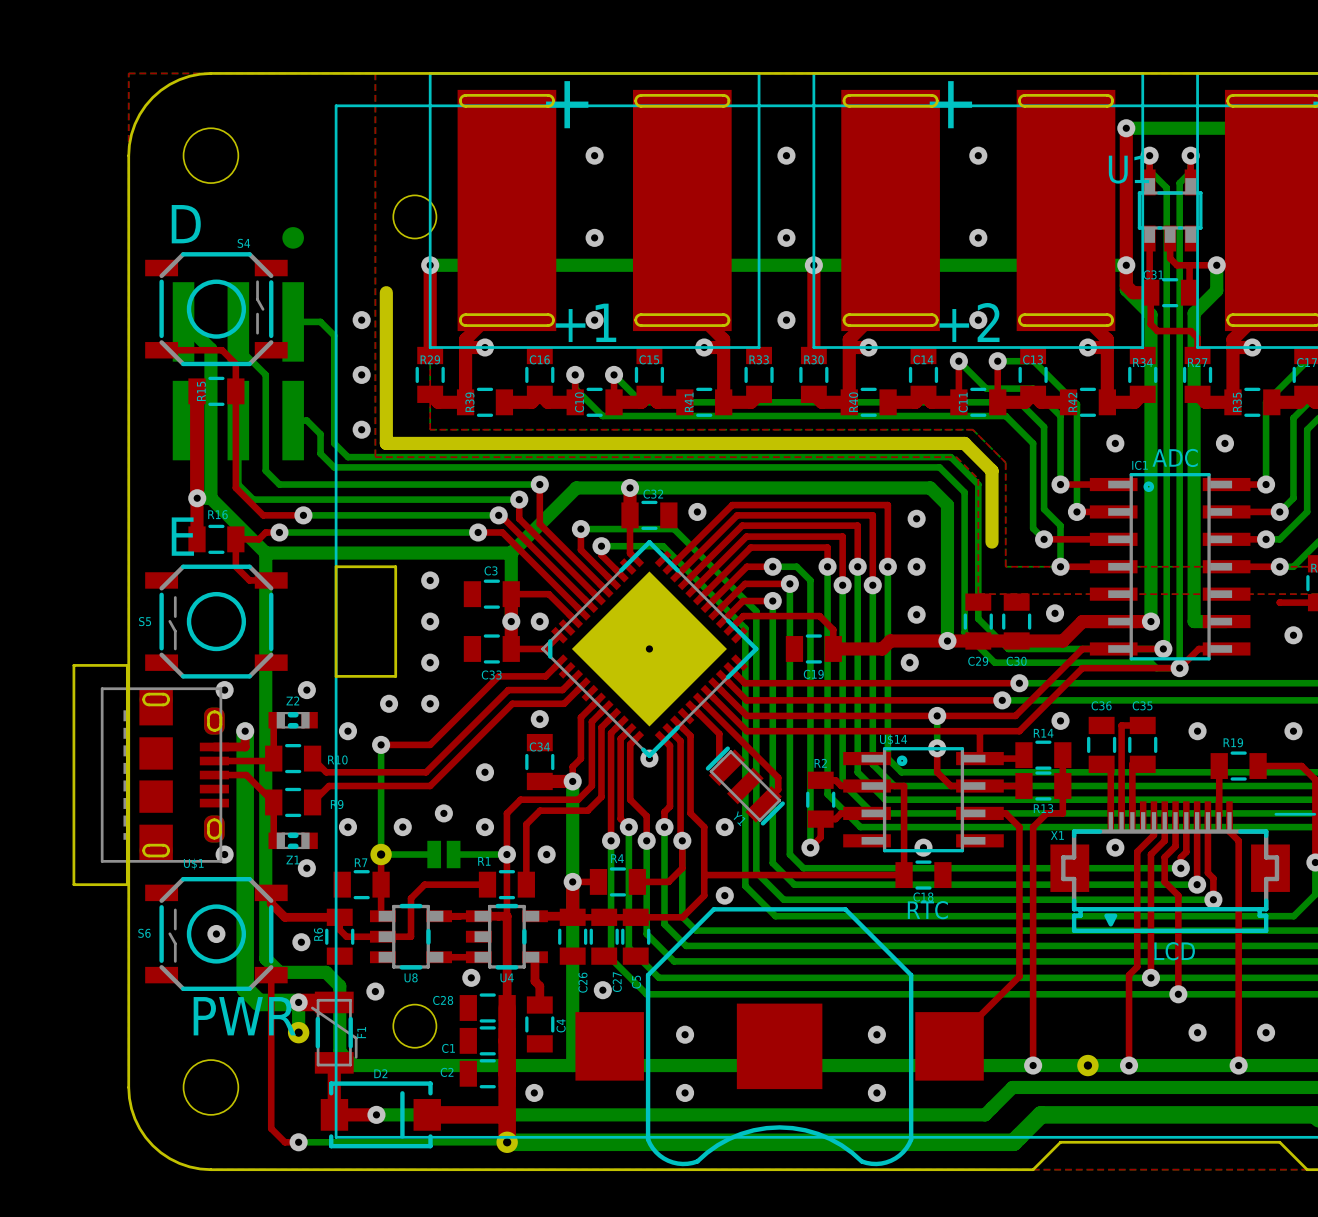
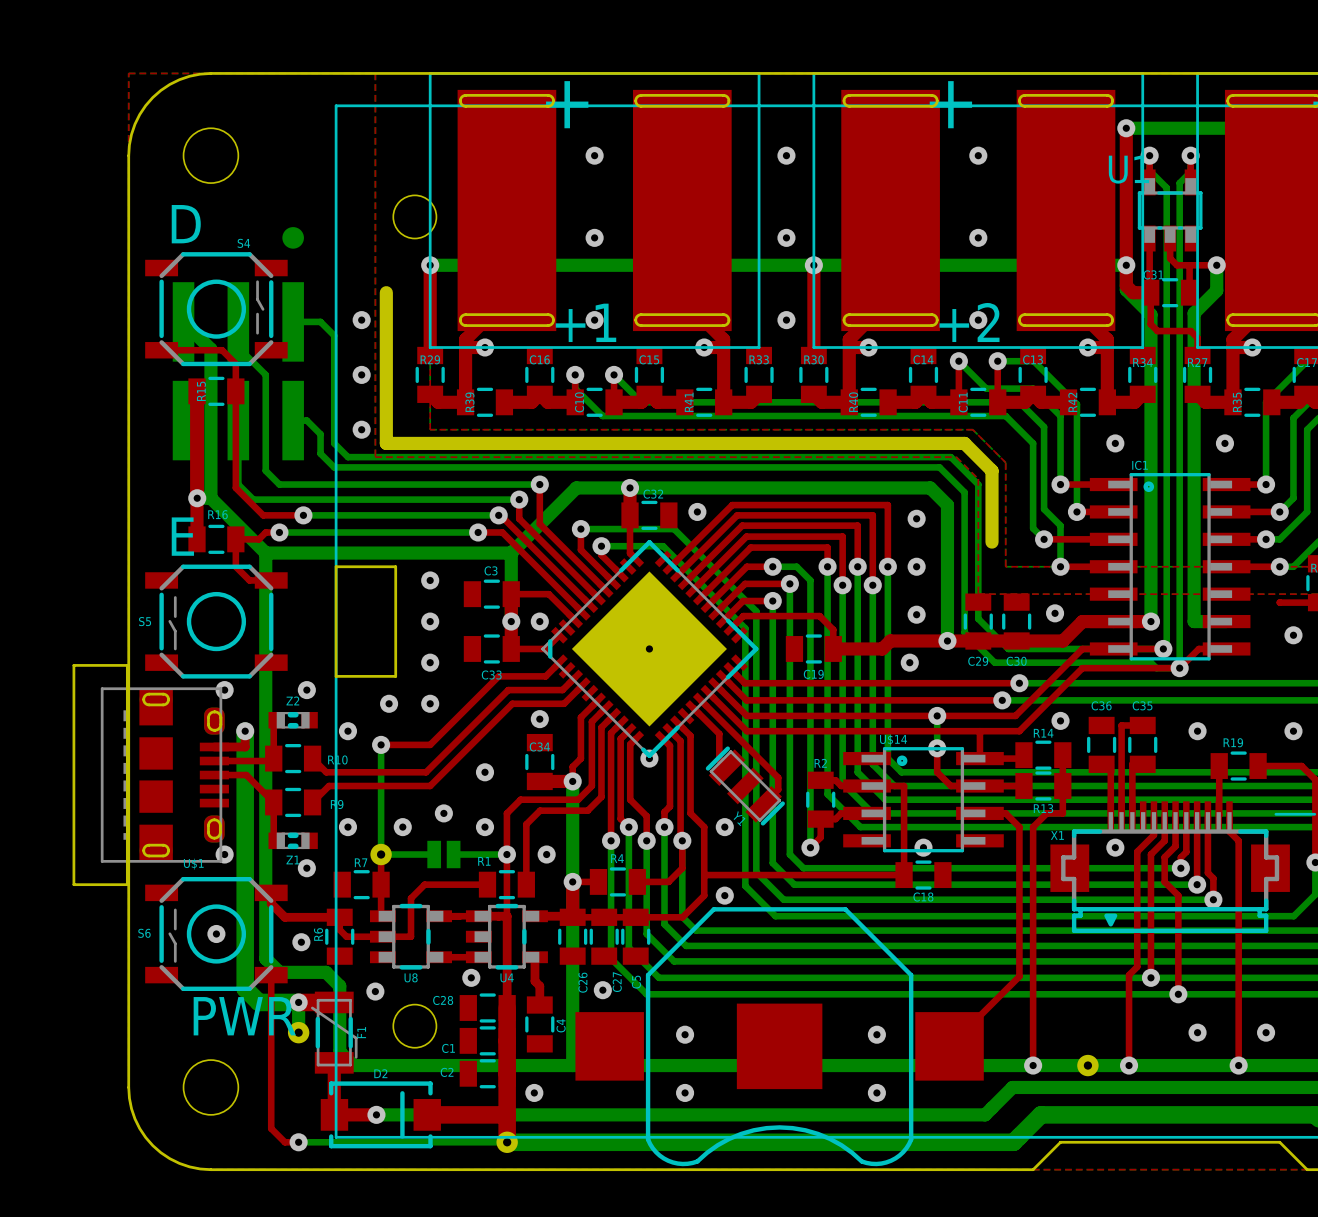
text: ADC (1175, 457) -> none
text: RTC (927, 910) -> none
text: LCD (1174, 951) -> none

